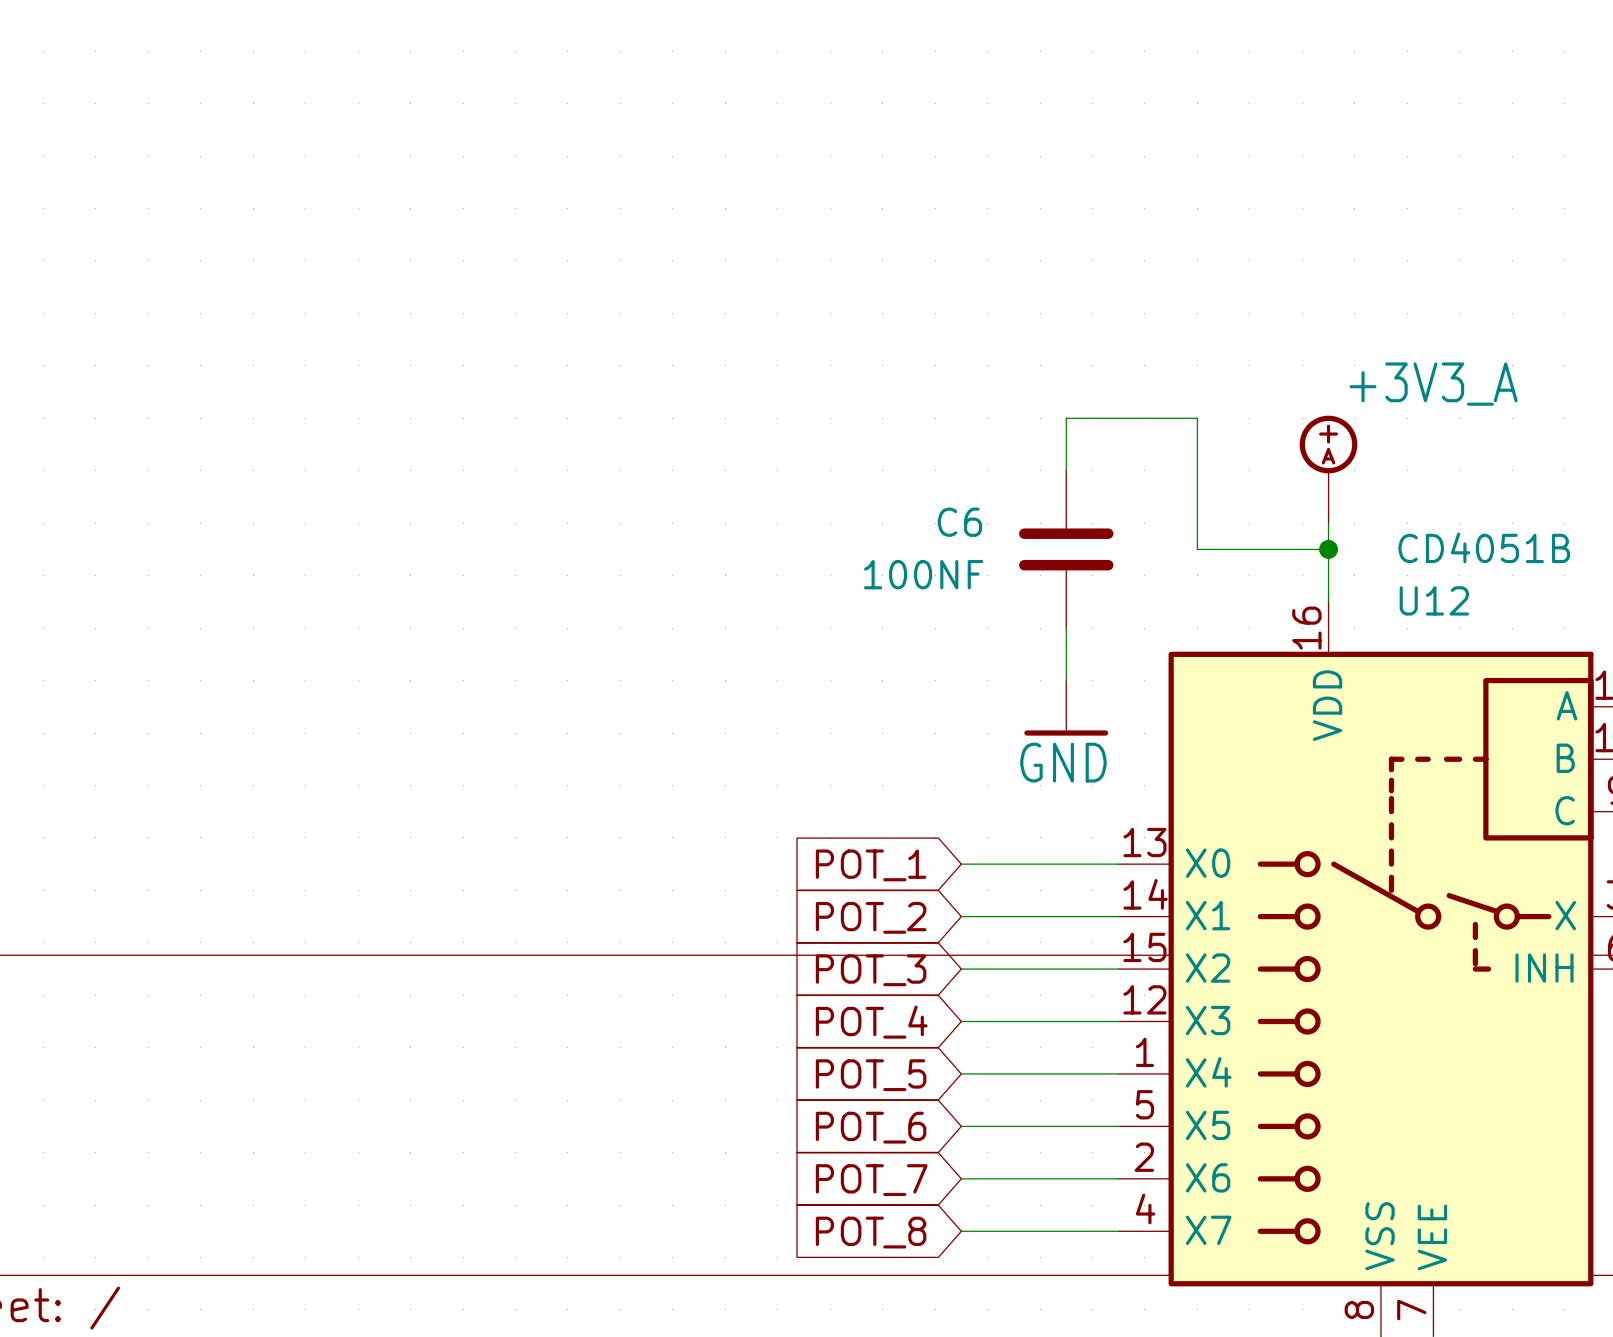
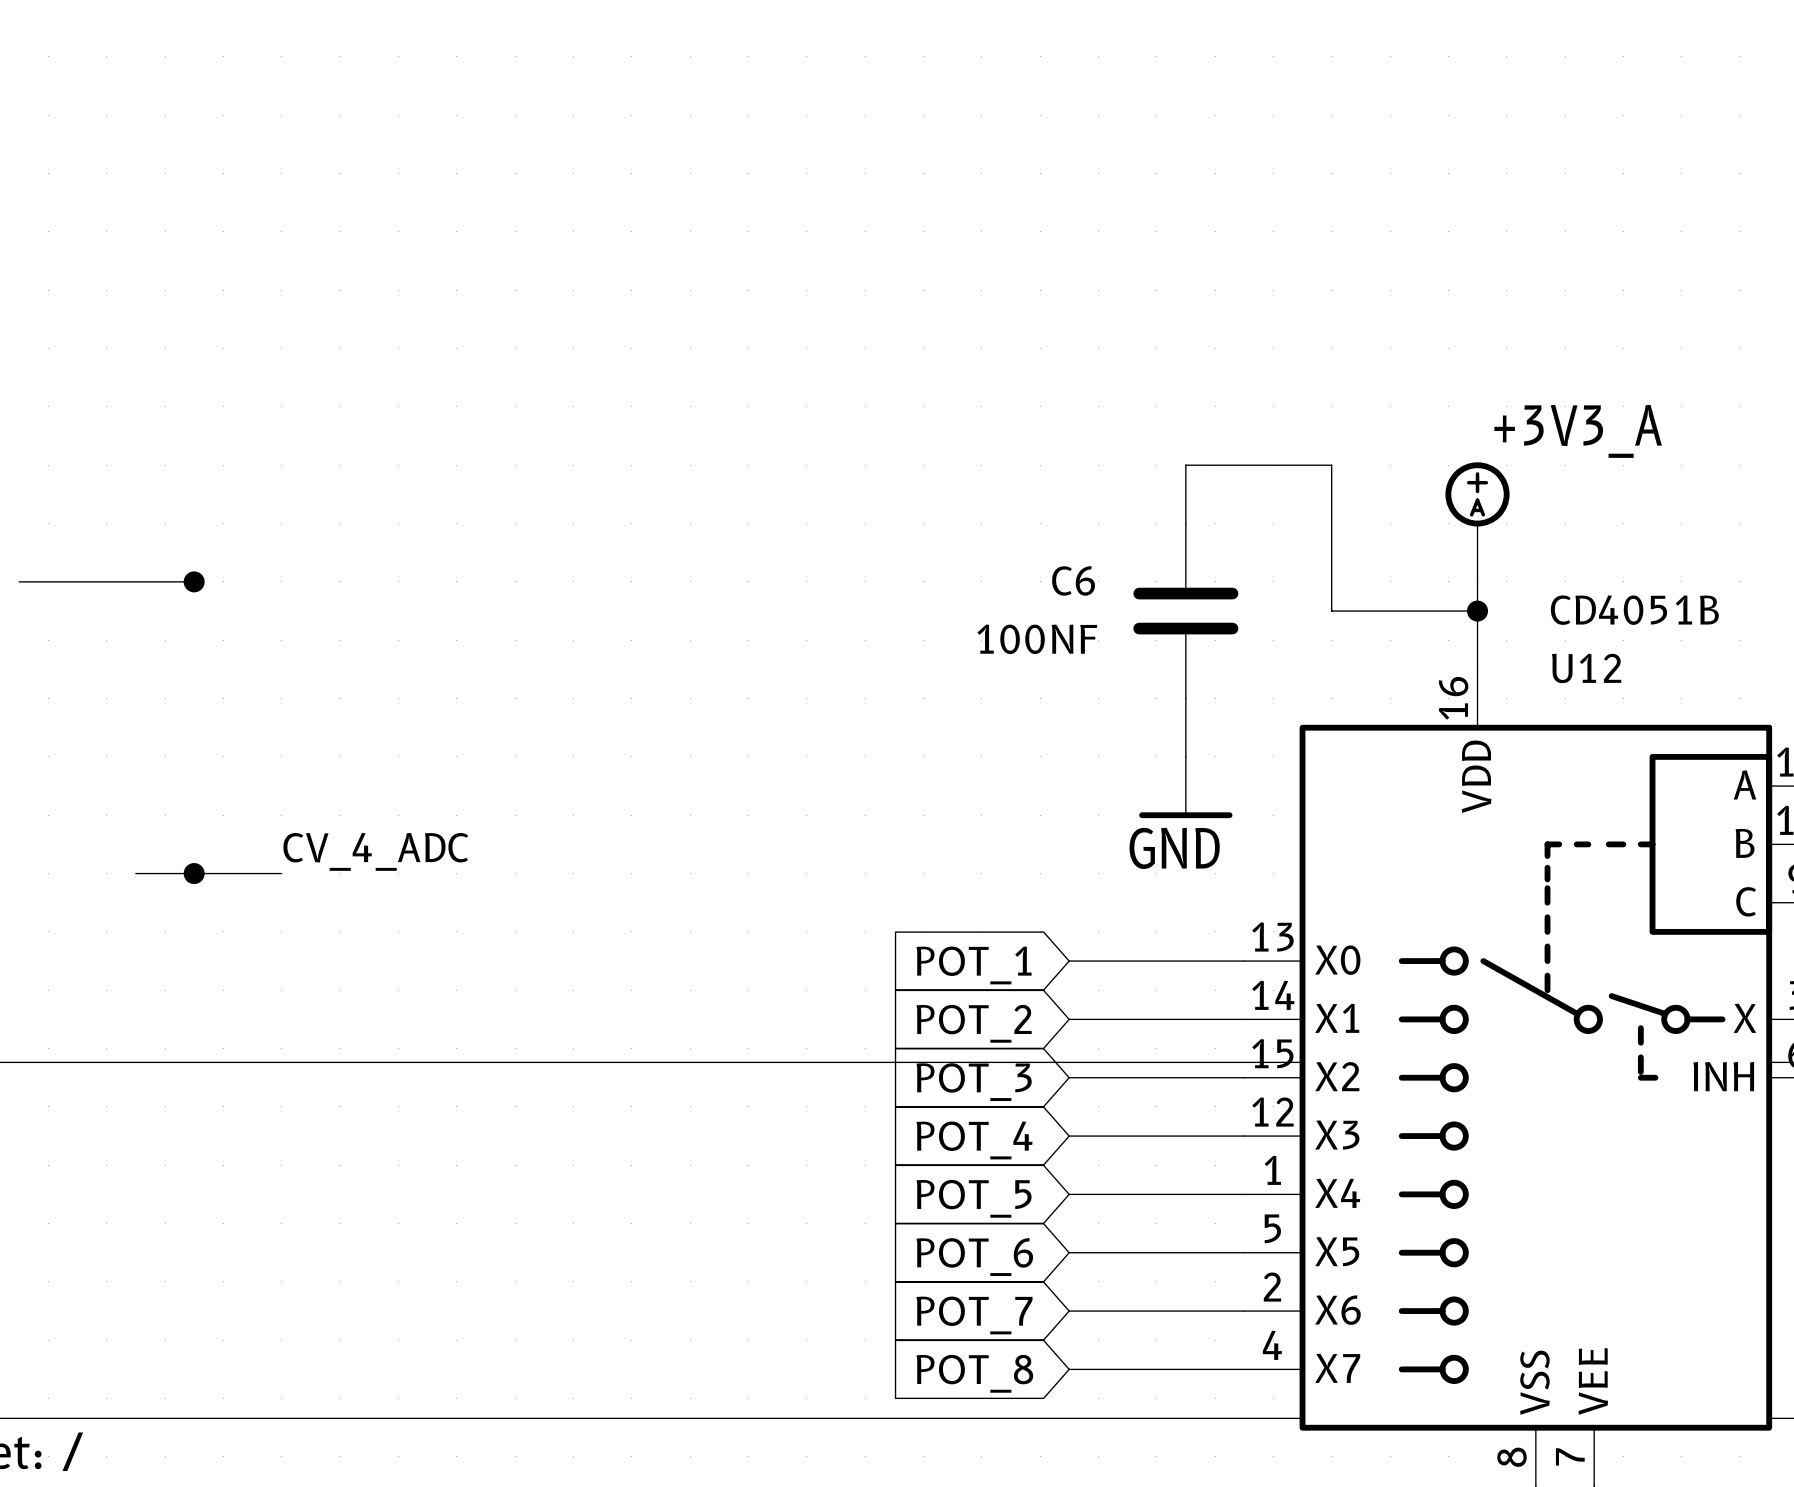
wire: none -> (19, 581) (194, 581)
junction: none -> (194, 581)
label: none -> CV_4_ADC (375, 851)
wire: none -> (135, 873) (281, 873)
junction: none -> (194, 873)

